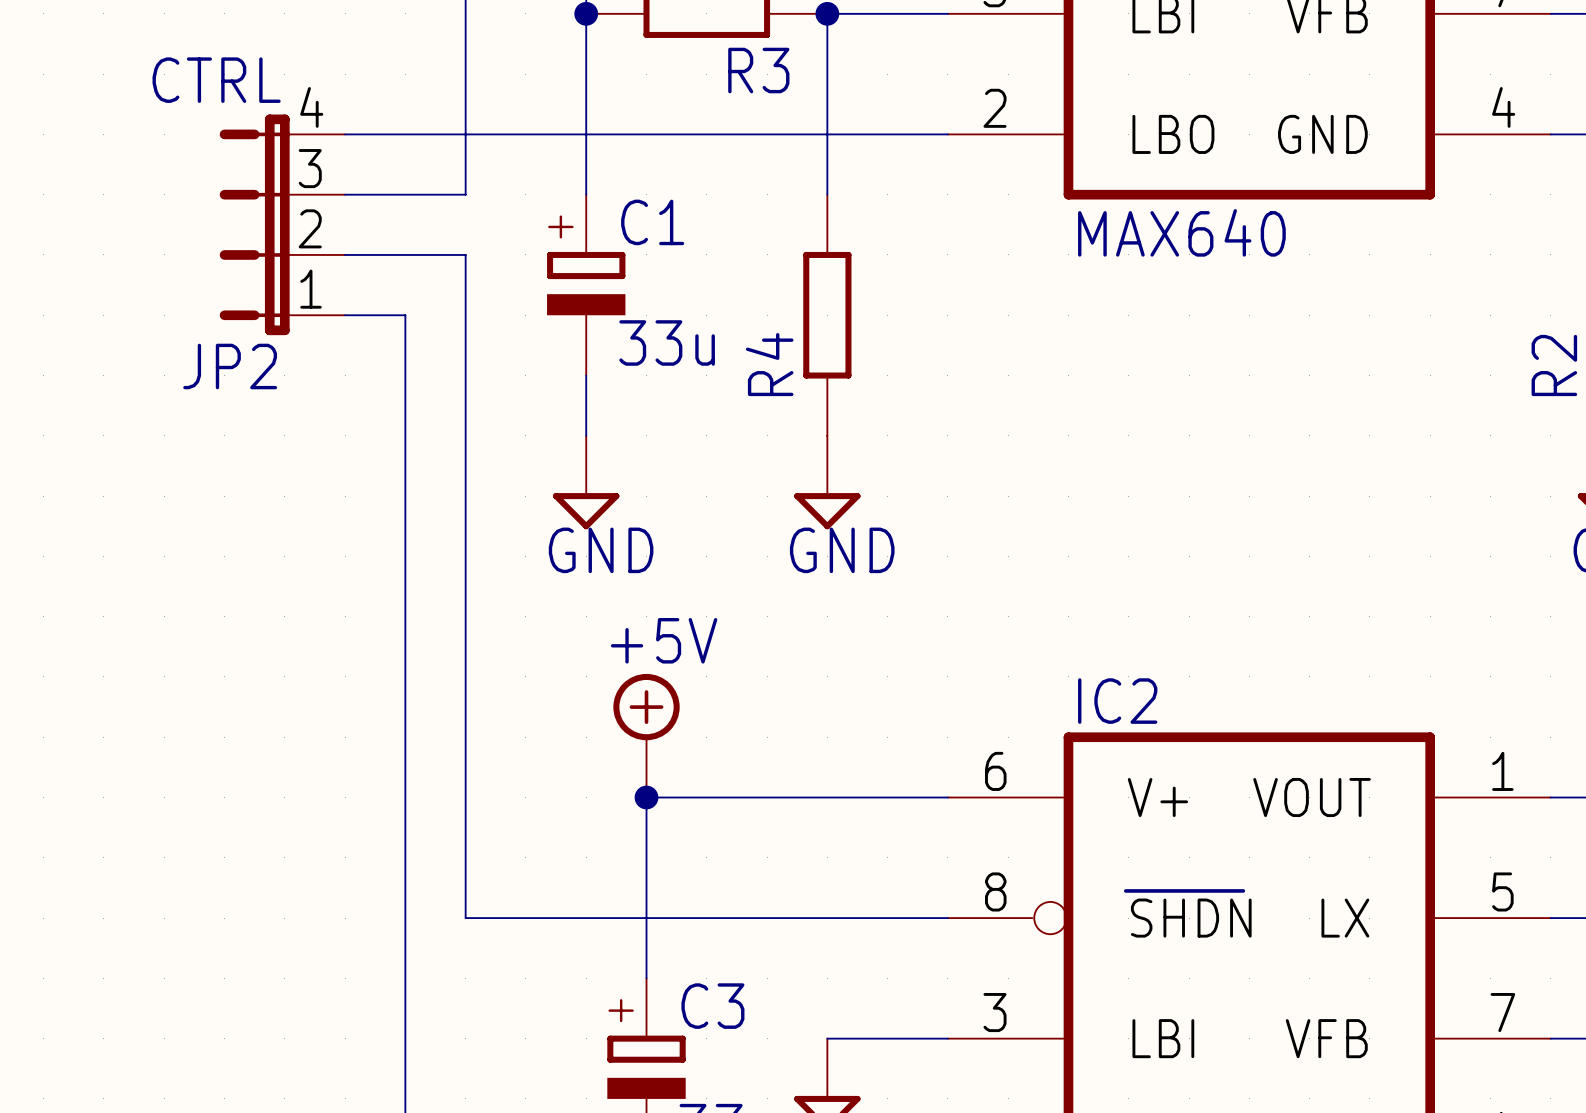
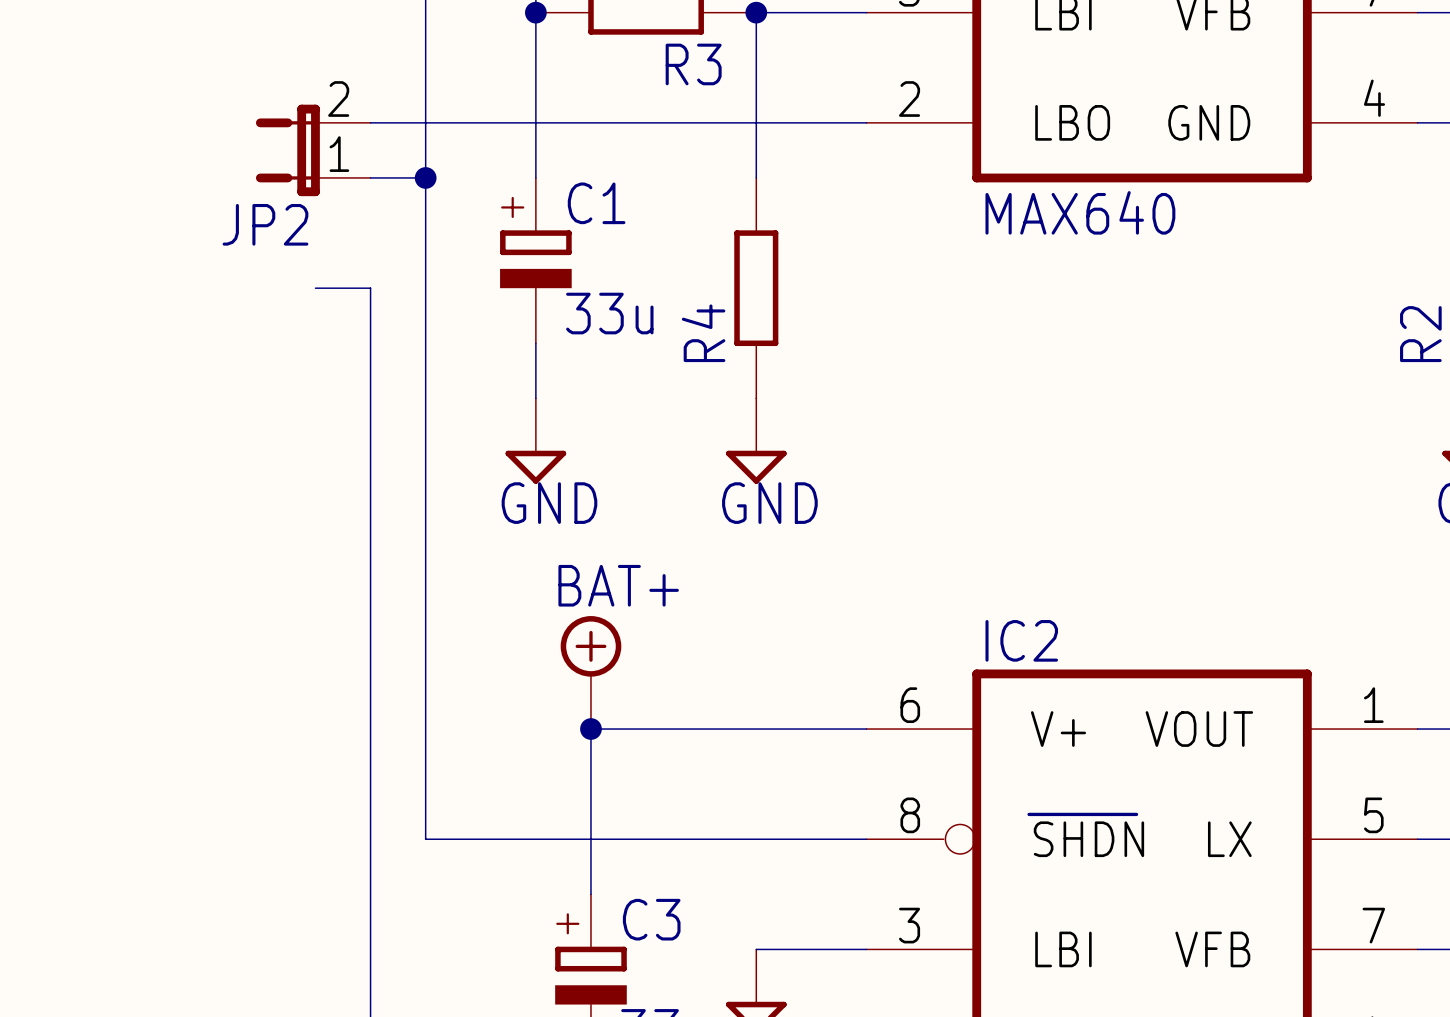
JP2 value: CTRL (216, 80) -> none
JP2 symbol: [219, 114, 346, 336] -> [255, 104, 371, 197]
junction: none -> (425, 177)
wire: (345, 254) (465, 254) -> (425, 177) (425, 233)
JP2 name position: JP2 (230, 366) -> JP2 (265, 224)
power symbol: +5V (646, 735) -> BAT+ (590, 672)

